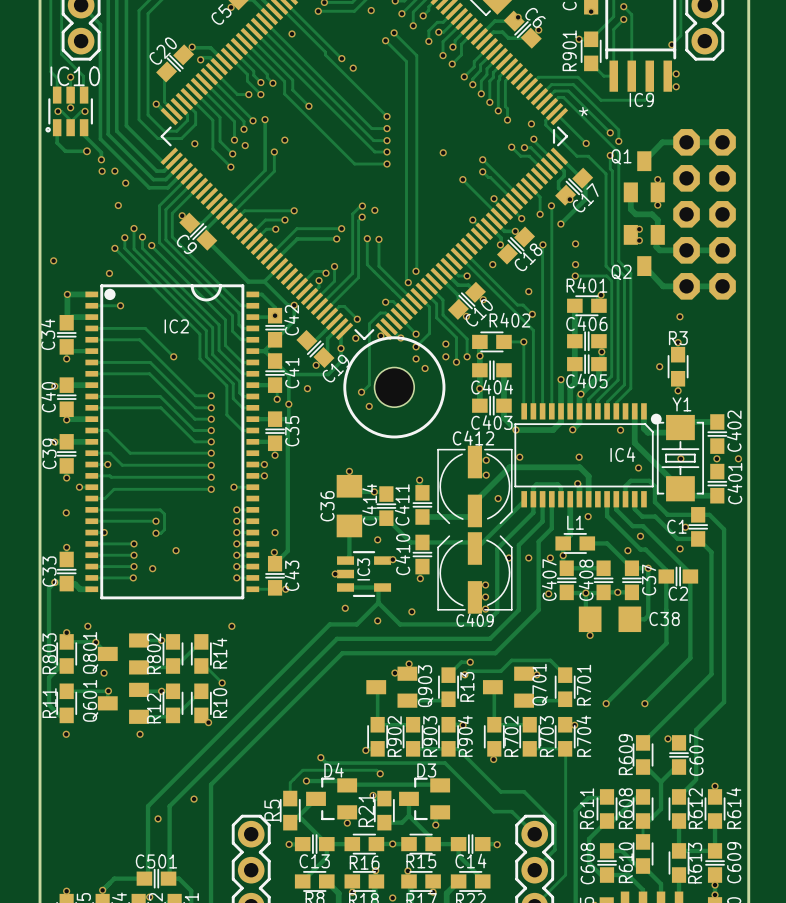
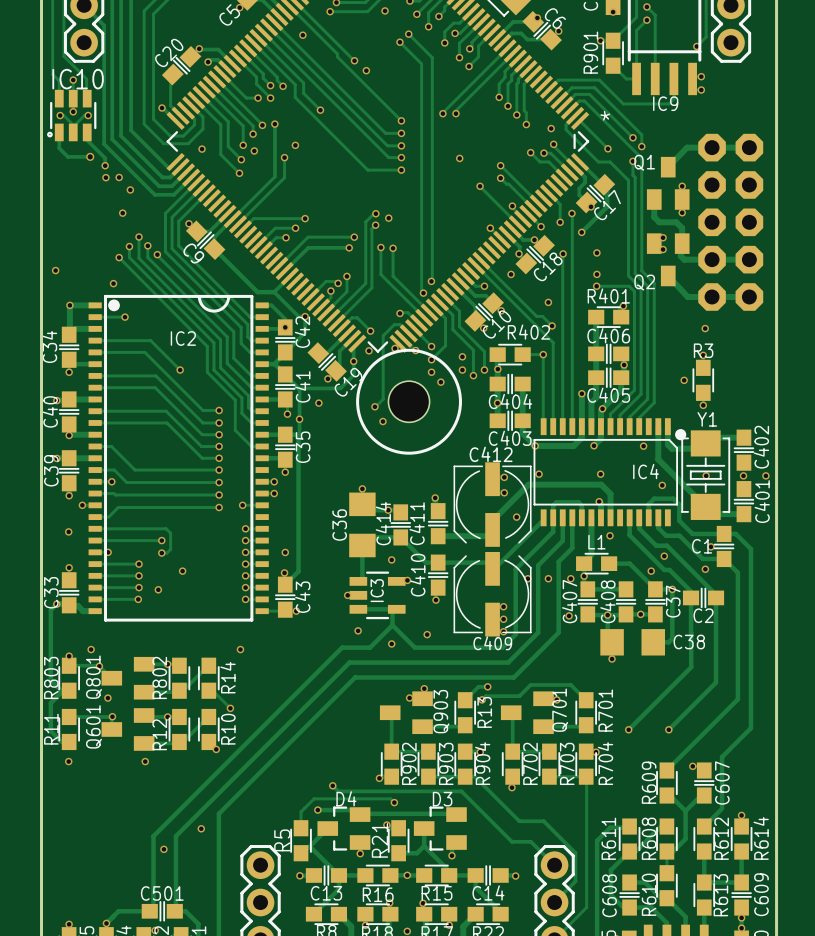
track: (494, 51) (480, 64) (480, 70) (472, 78) (472, 84) -> (512, 53) (455, 110) (455, 113)
track: (474, 61) (474, 66) (464, 76) -> (491, 63) (442, 113)
via: (464, 76) -> none
via: (472, 84) -> none
via: none -> (442, 113)
via: none -> (455, 113)

